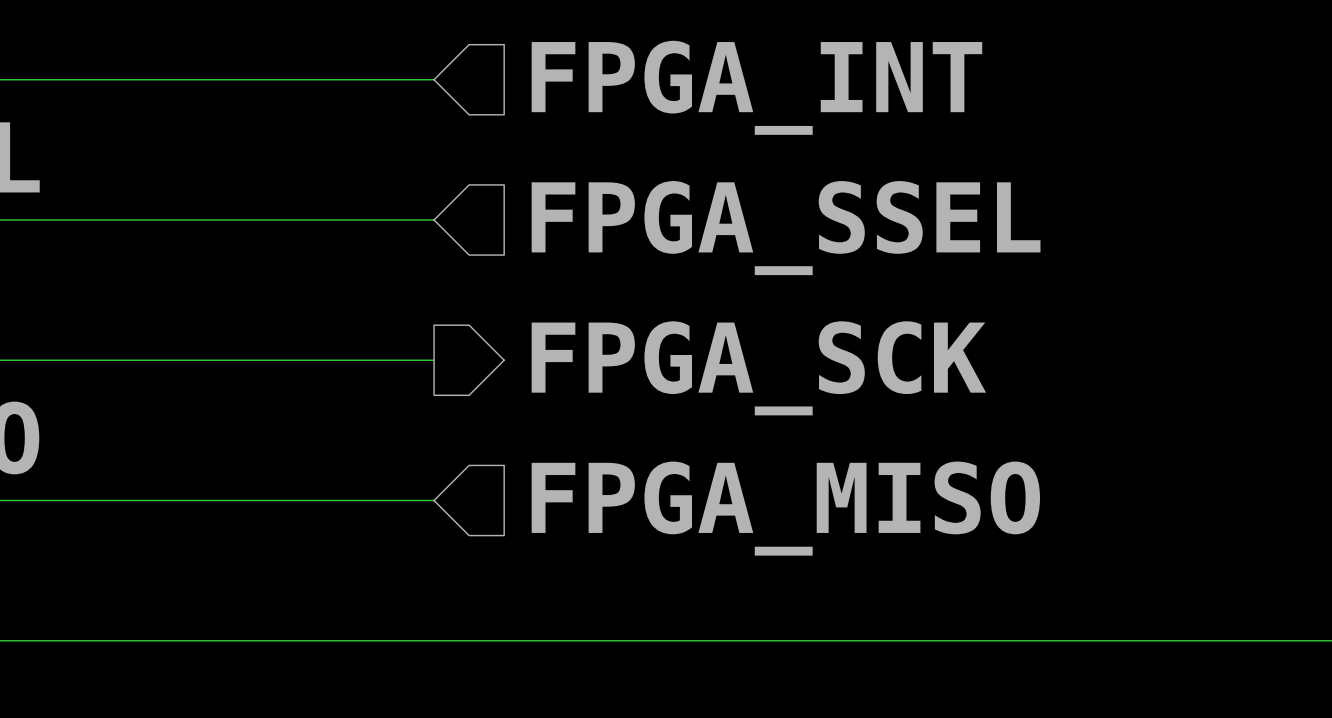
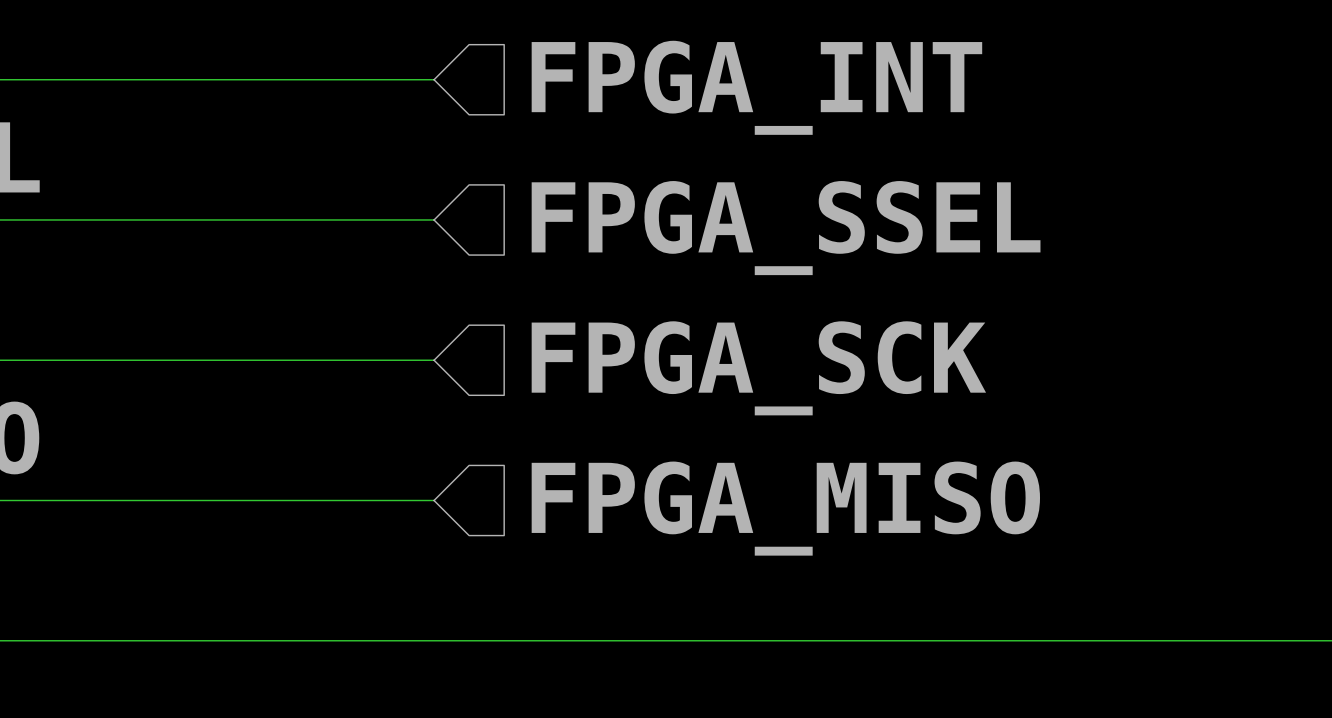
hierarchical label shape: output (758, 368) -> input (758, 368)

